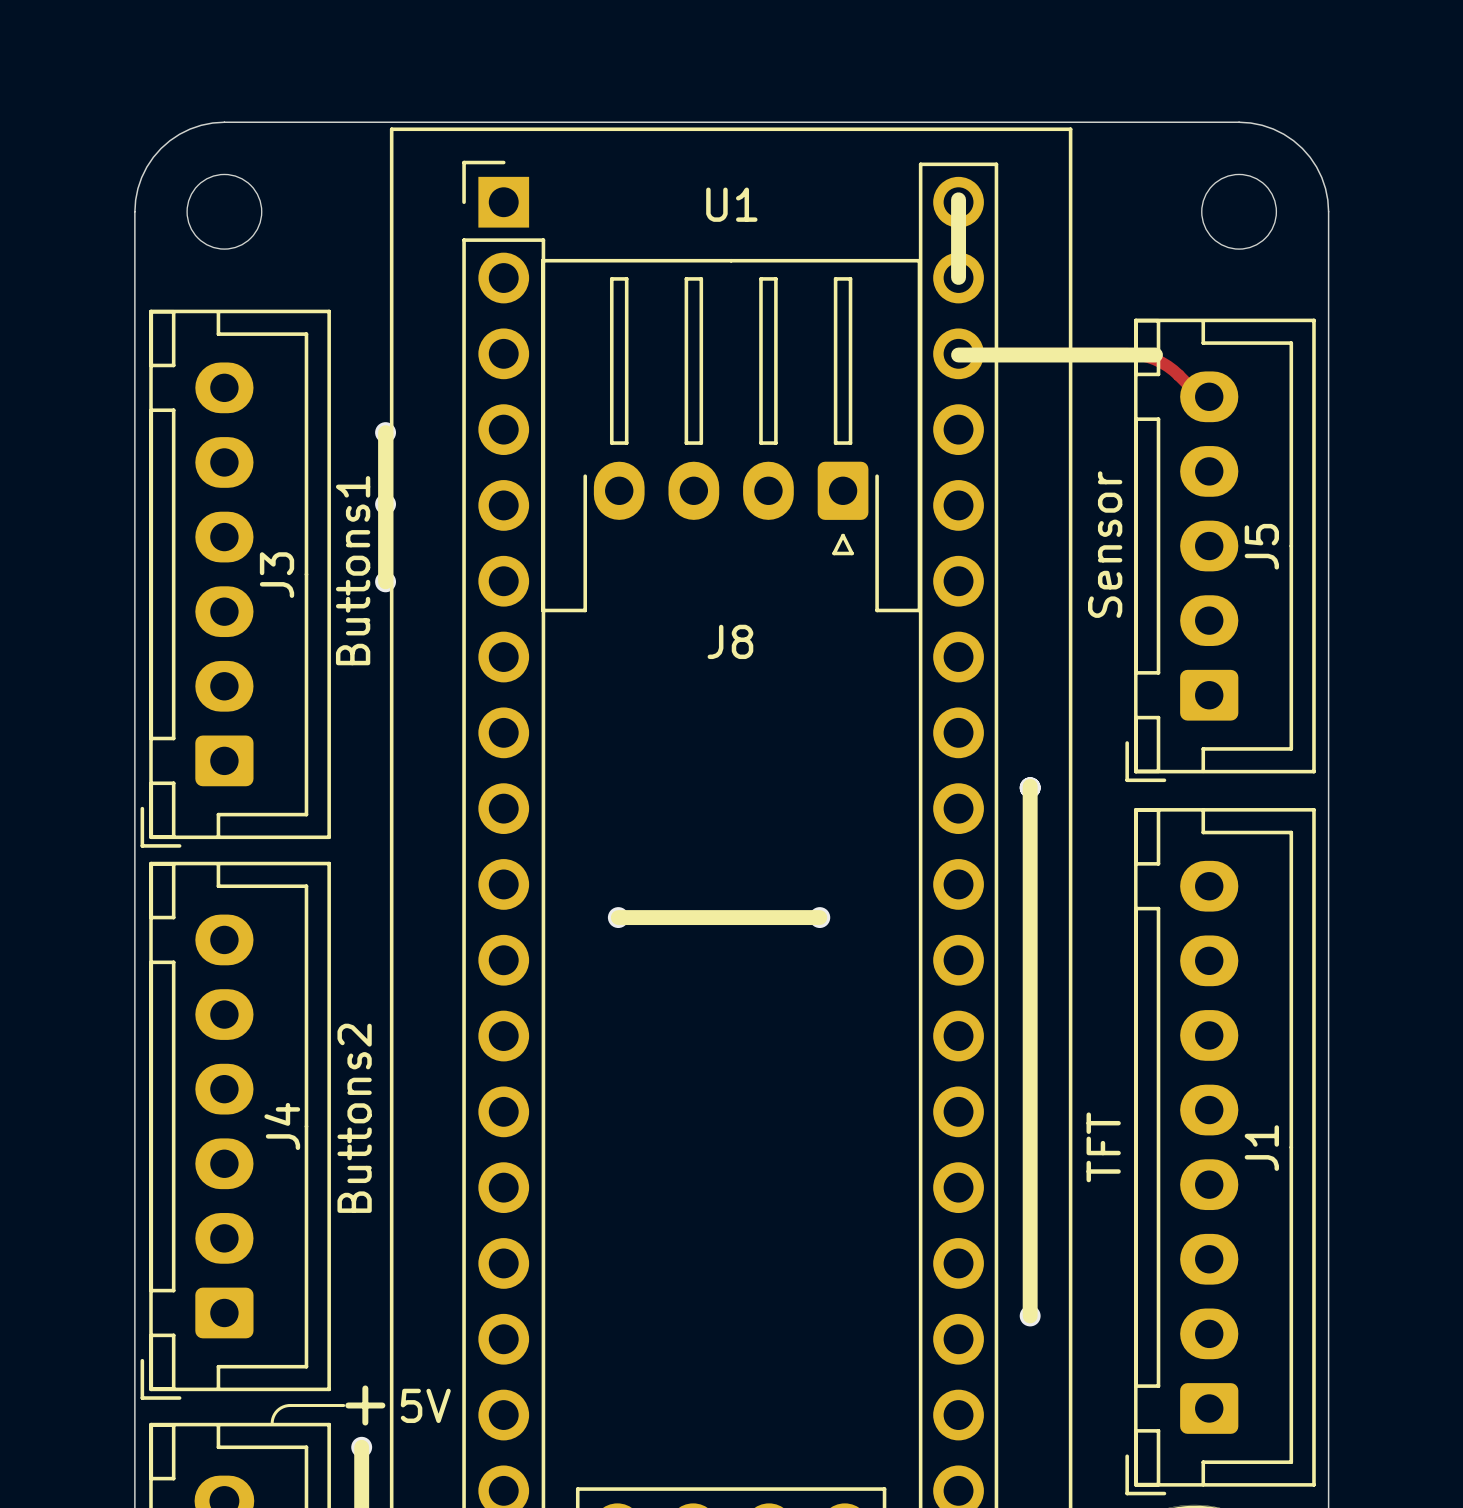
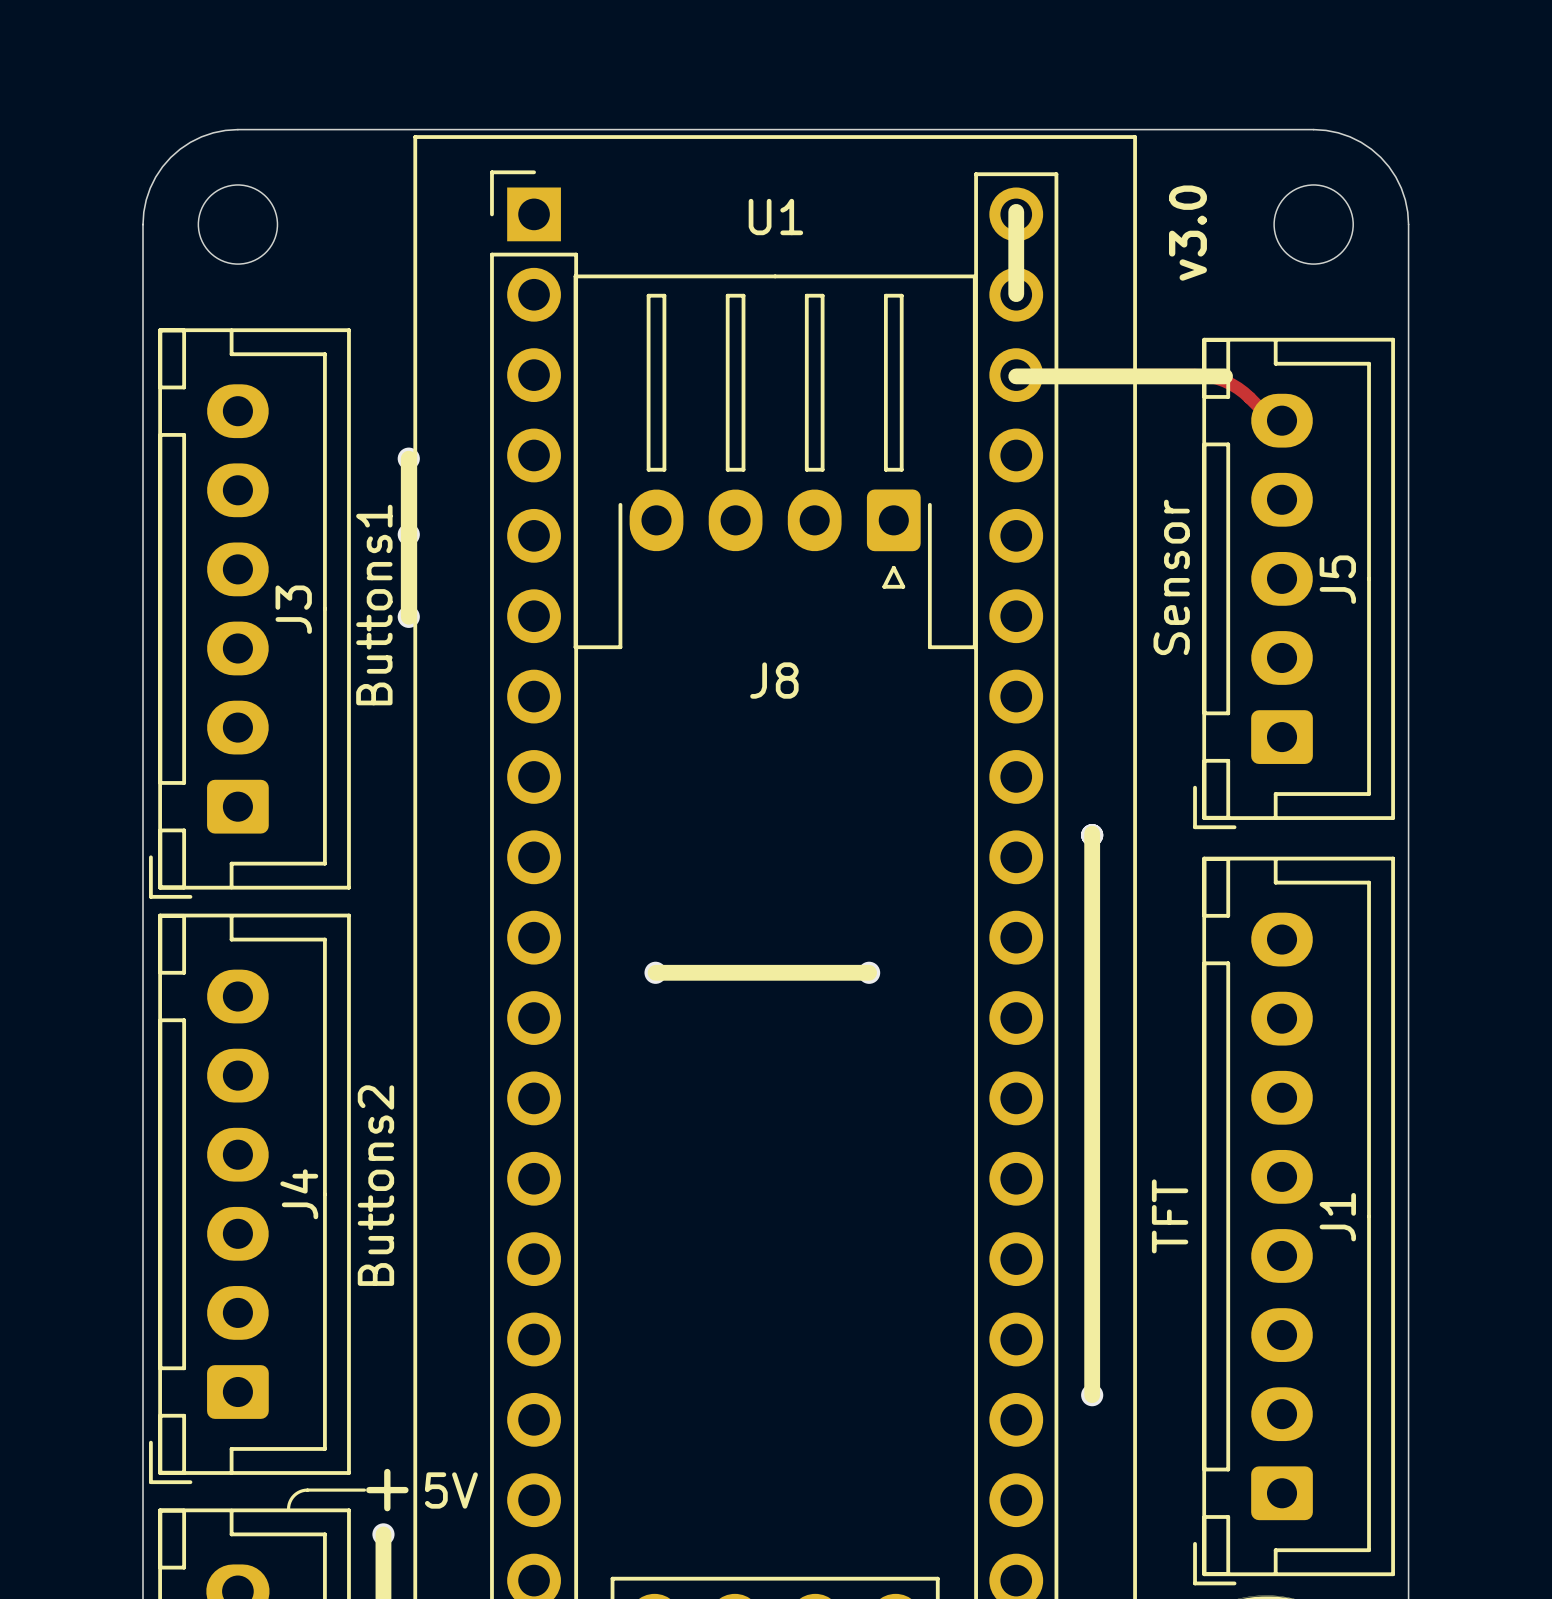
text: none -> v3.0 (1187, 233)

